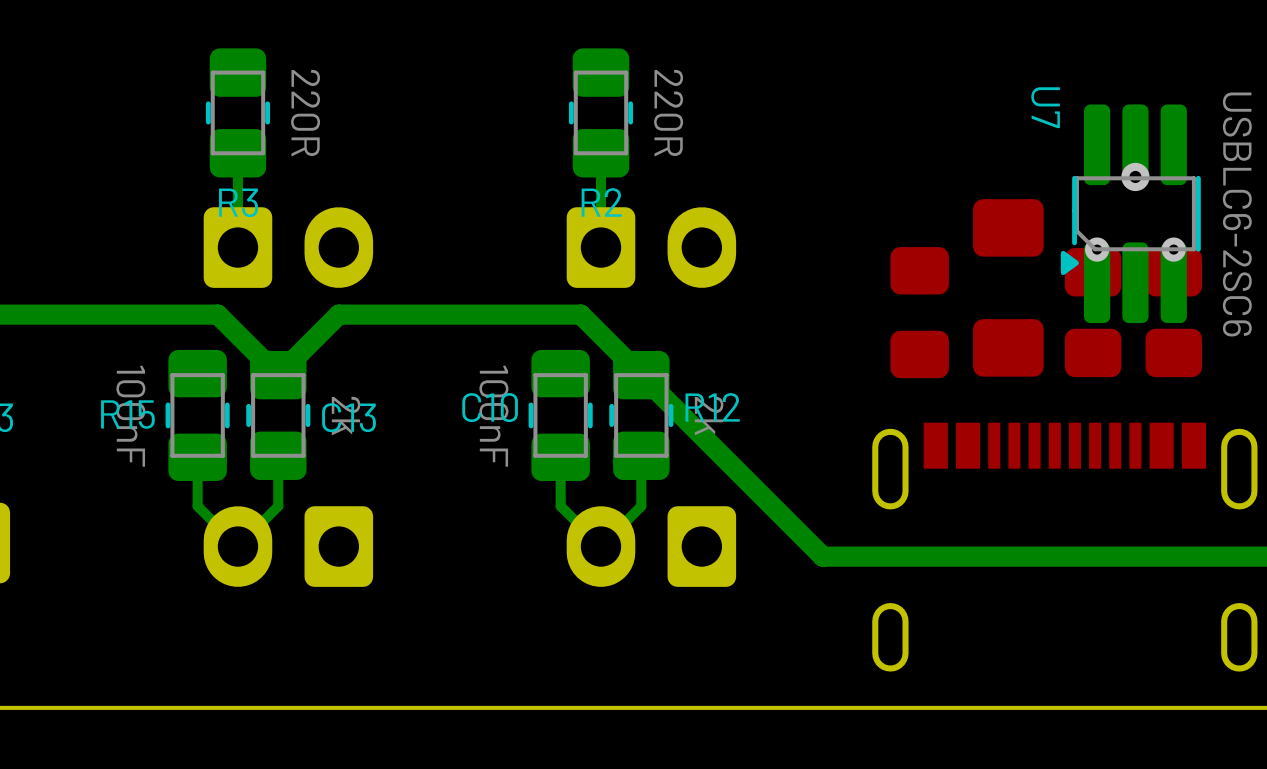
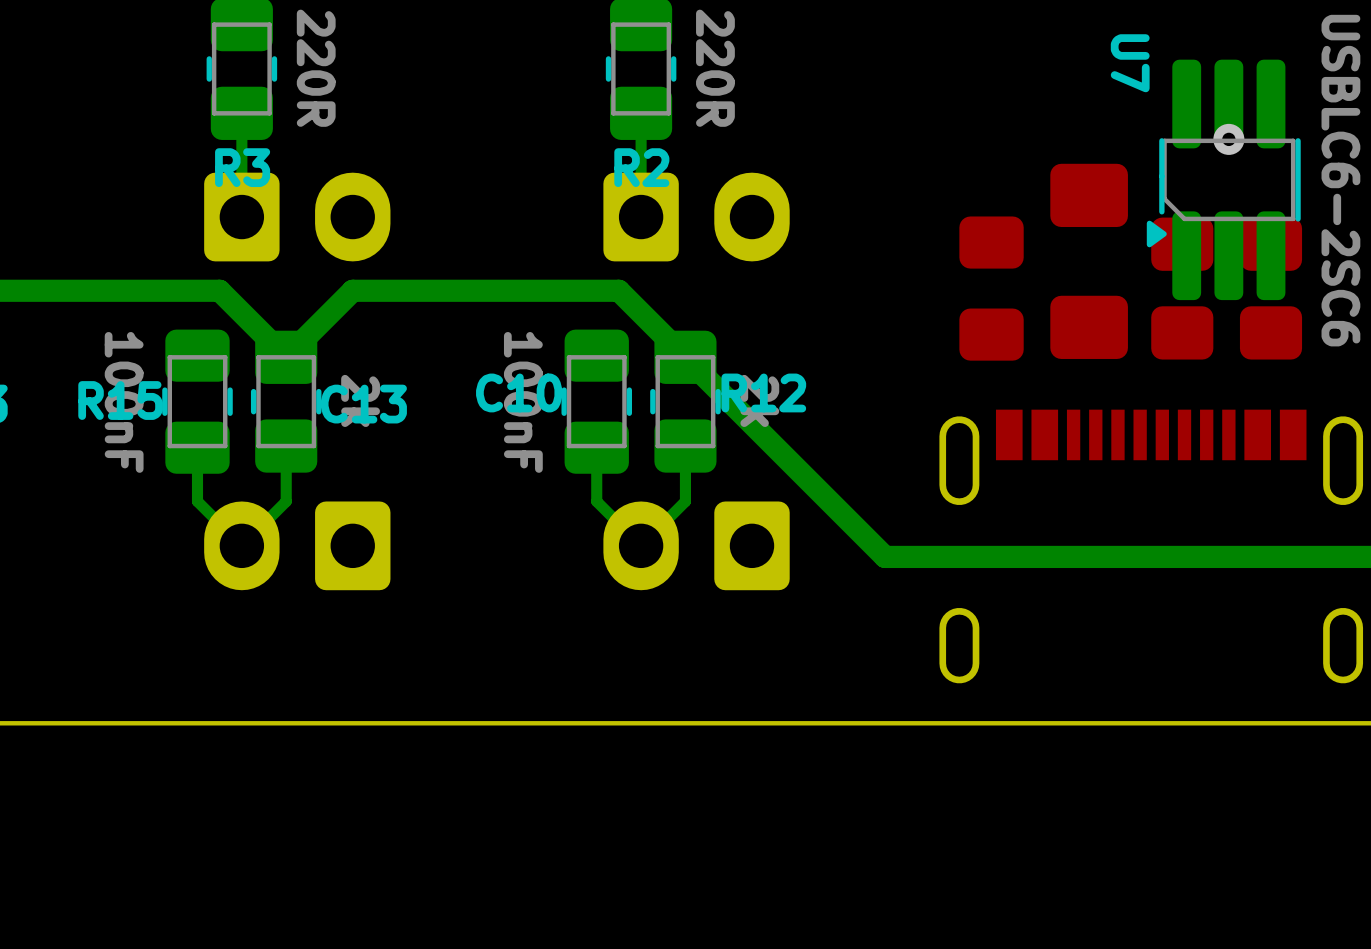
via: (1097, 249) -> none
via: (1173, 249) -> none

